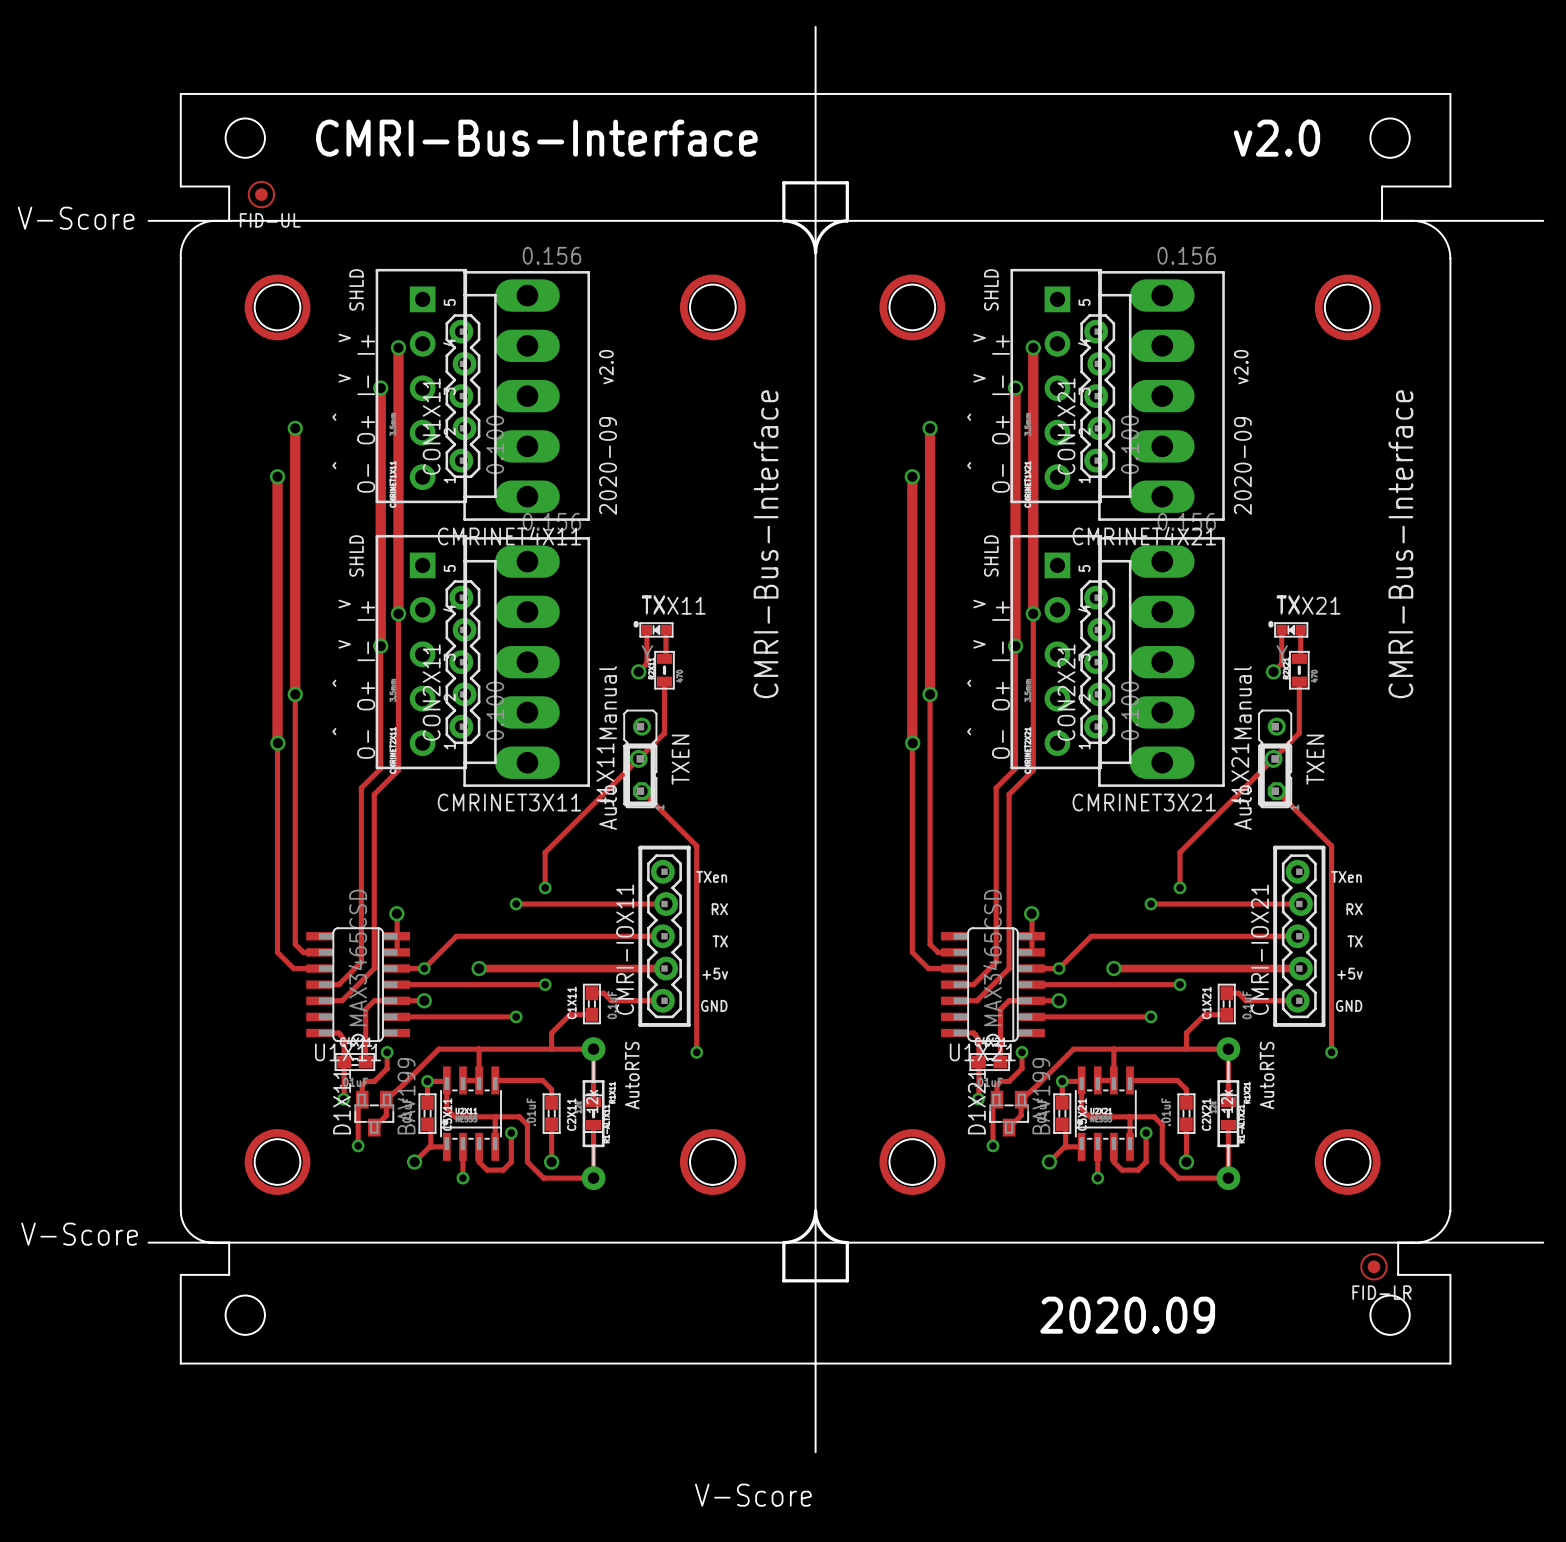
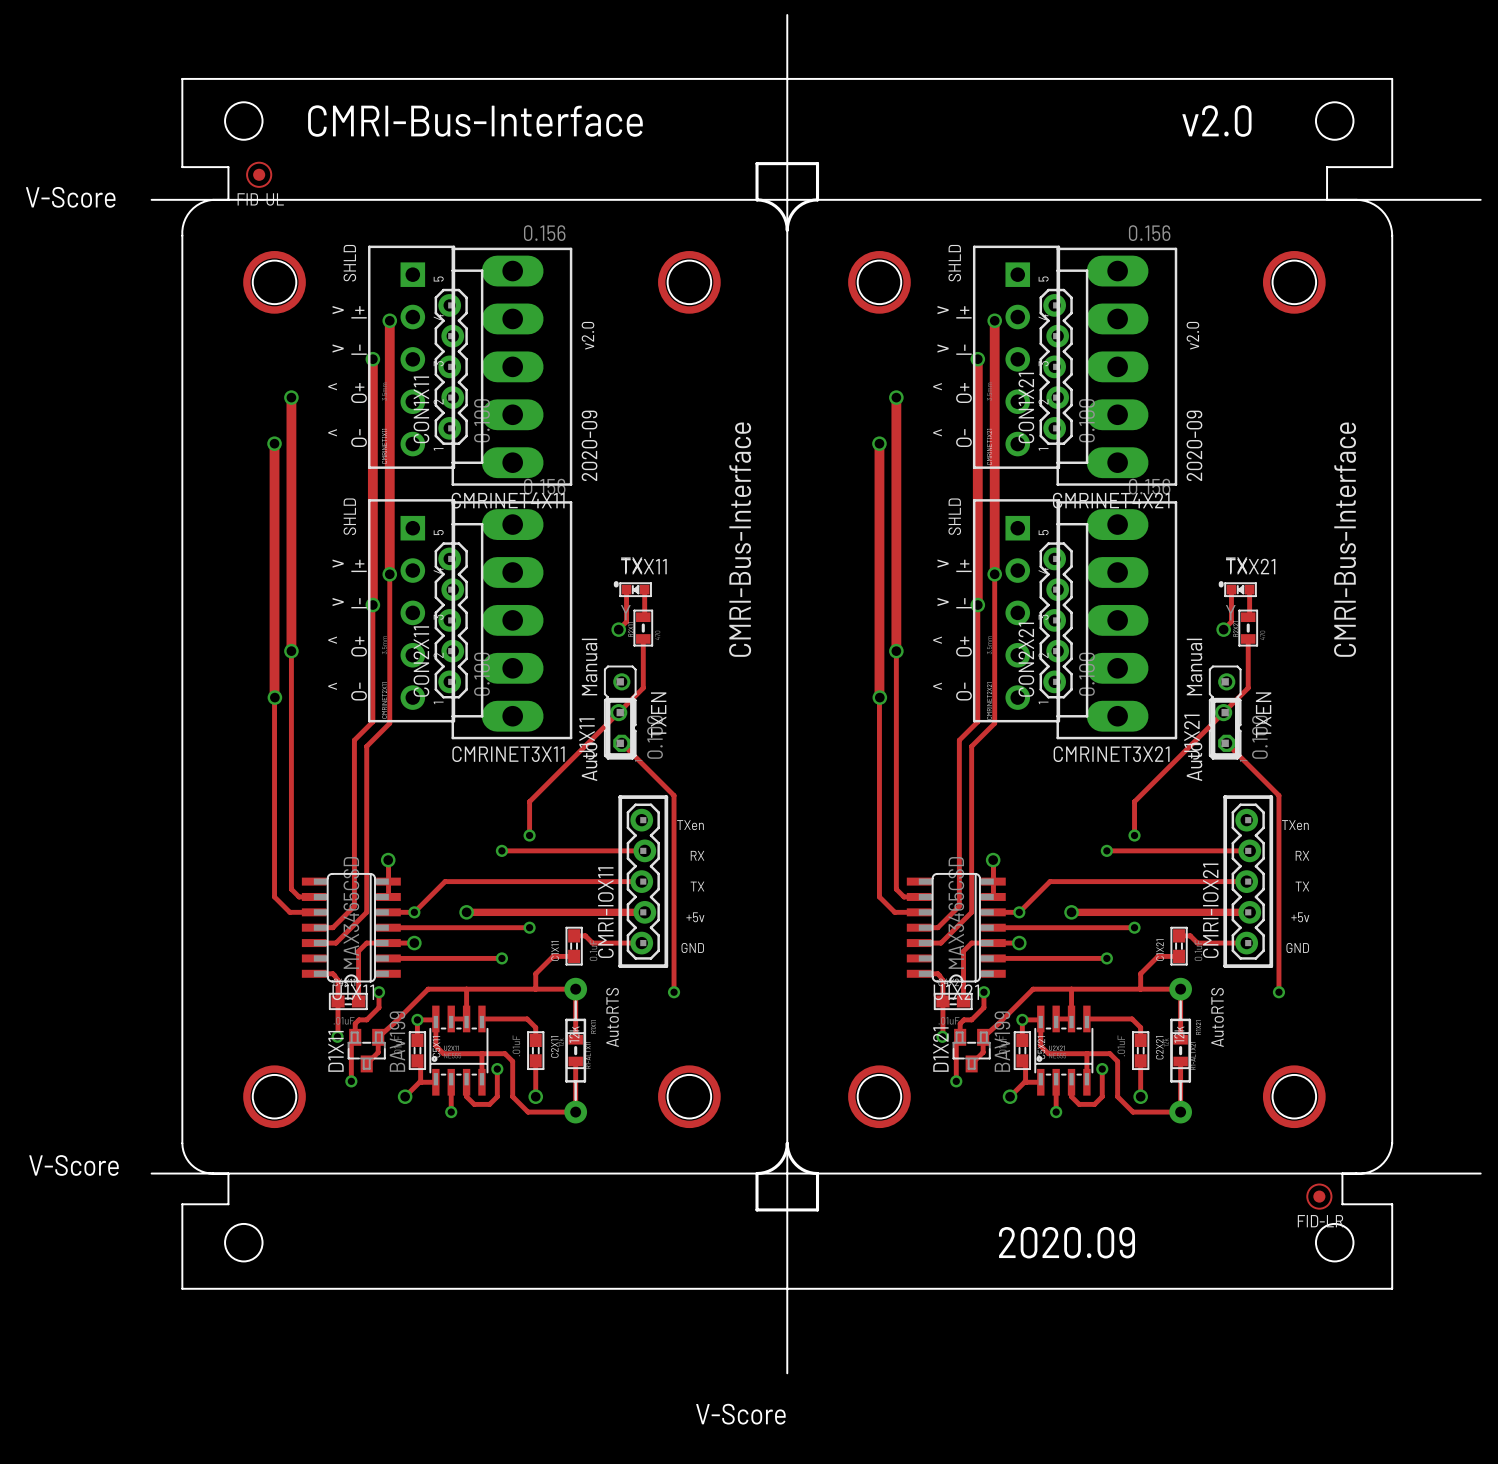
J1X11 value: none -> 0.100 (655, 737)
J1X21 value: none -> 0.100 (1259, 737)

